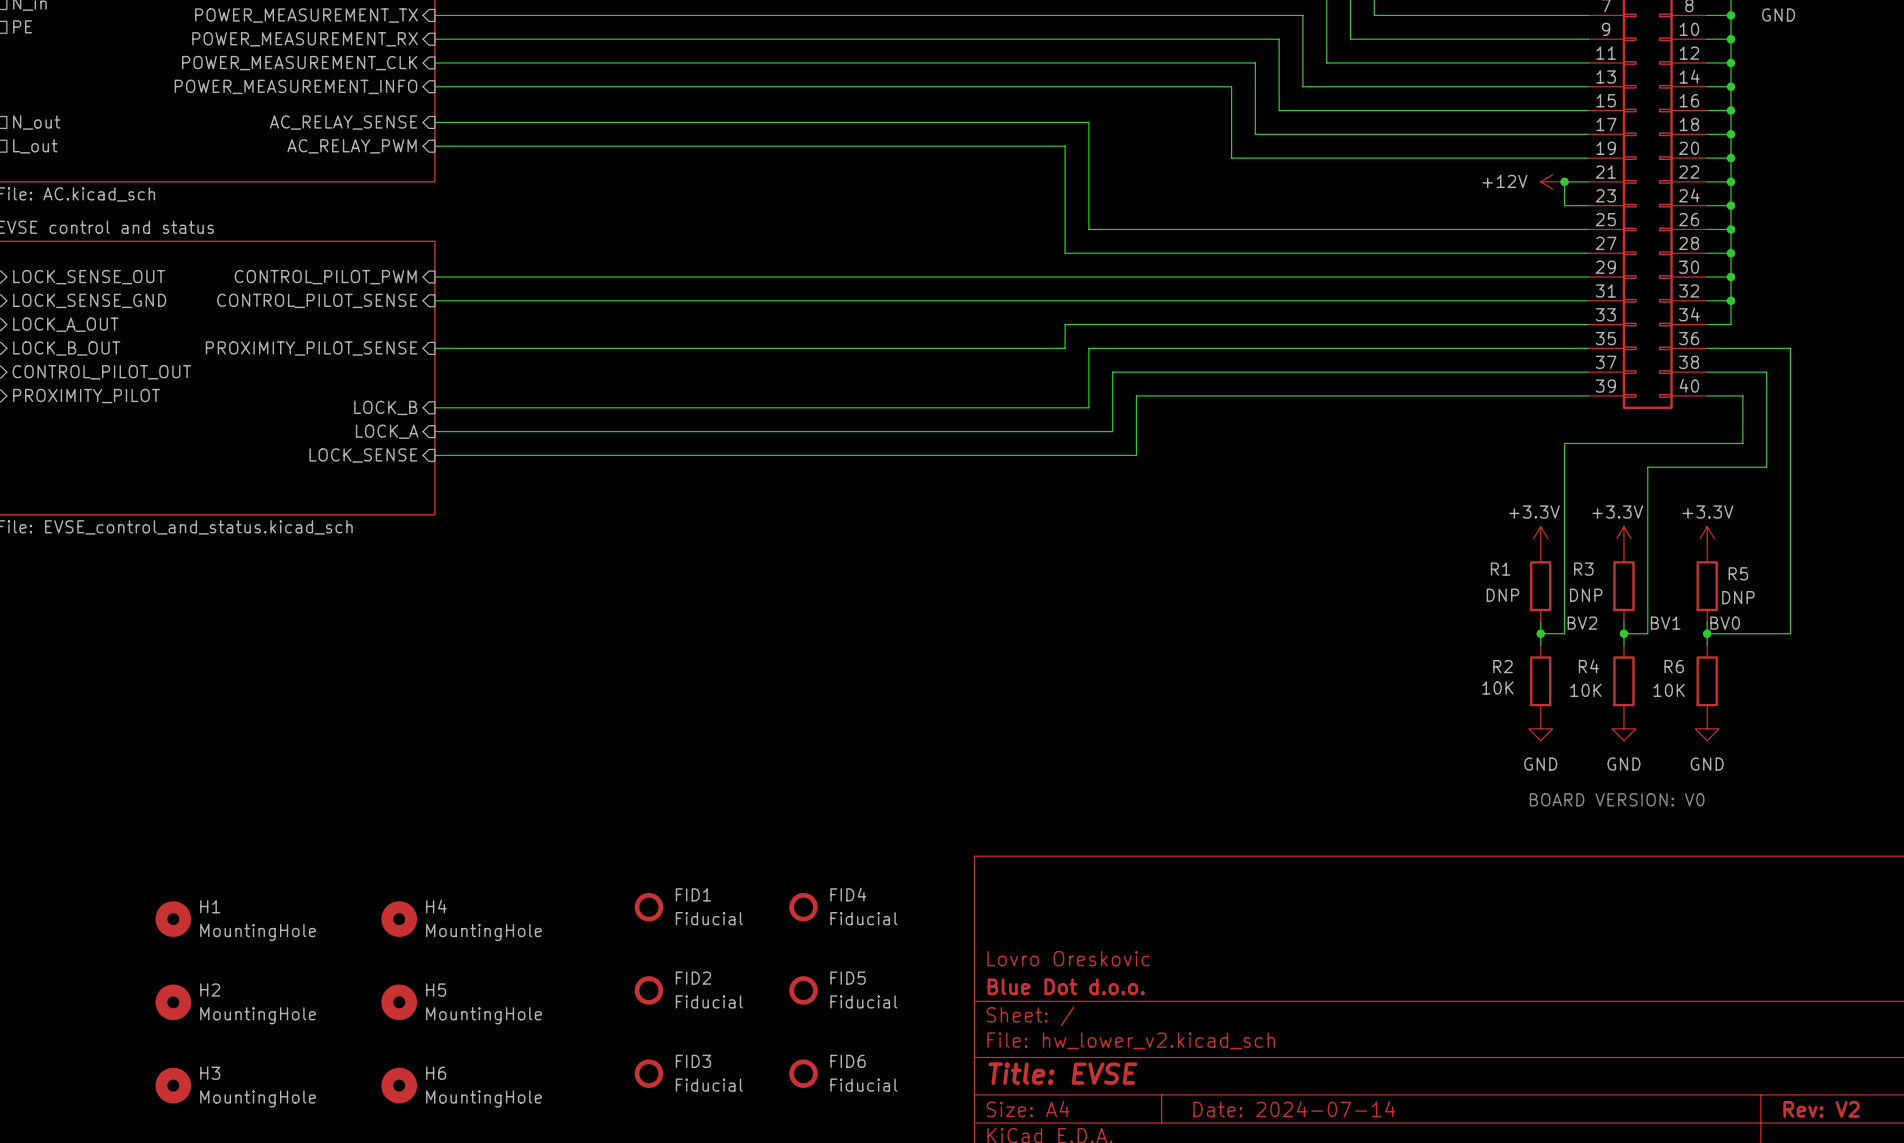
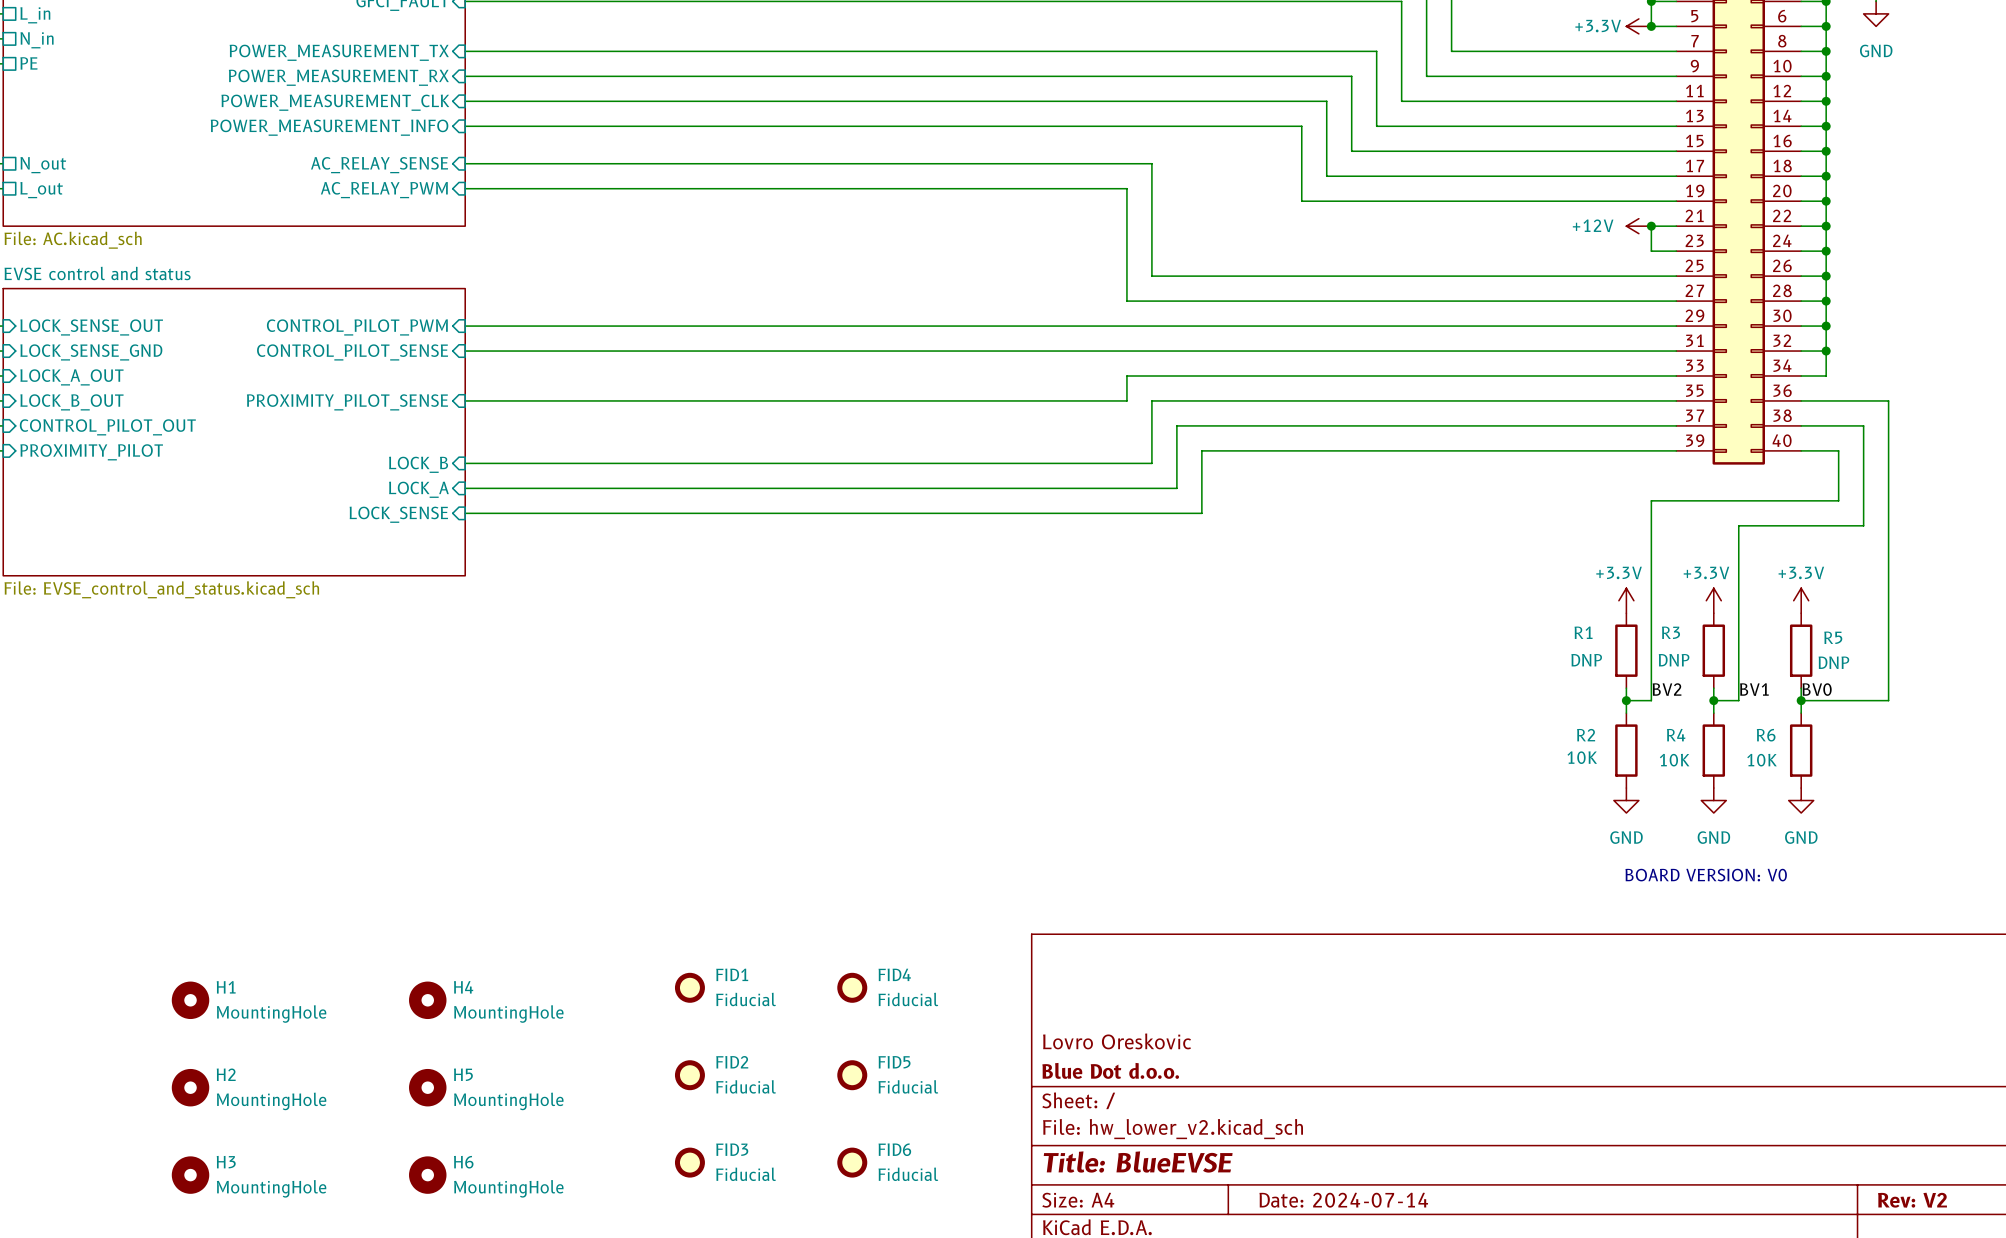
title block: Title: EVSE (1063, 1073) -> Title: BlueEVSE (1138, 1162)

